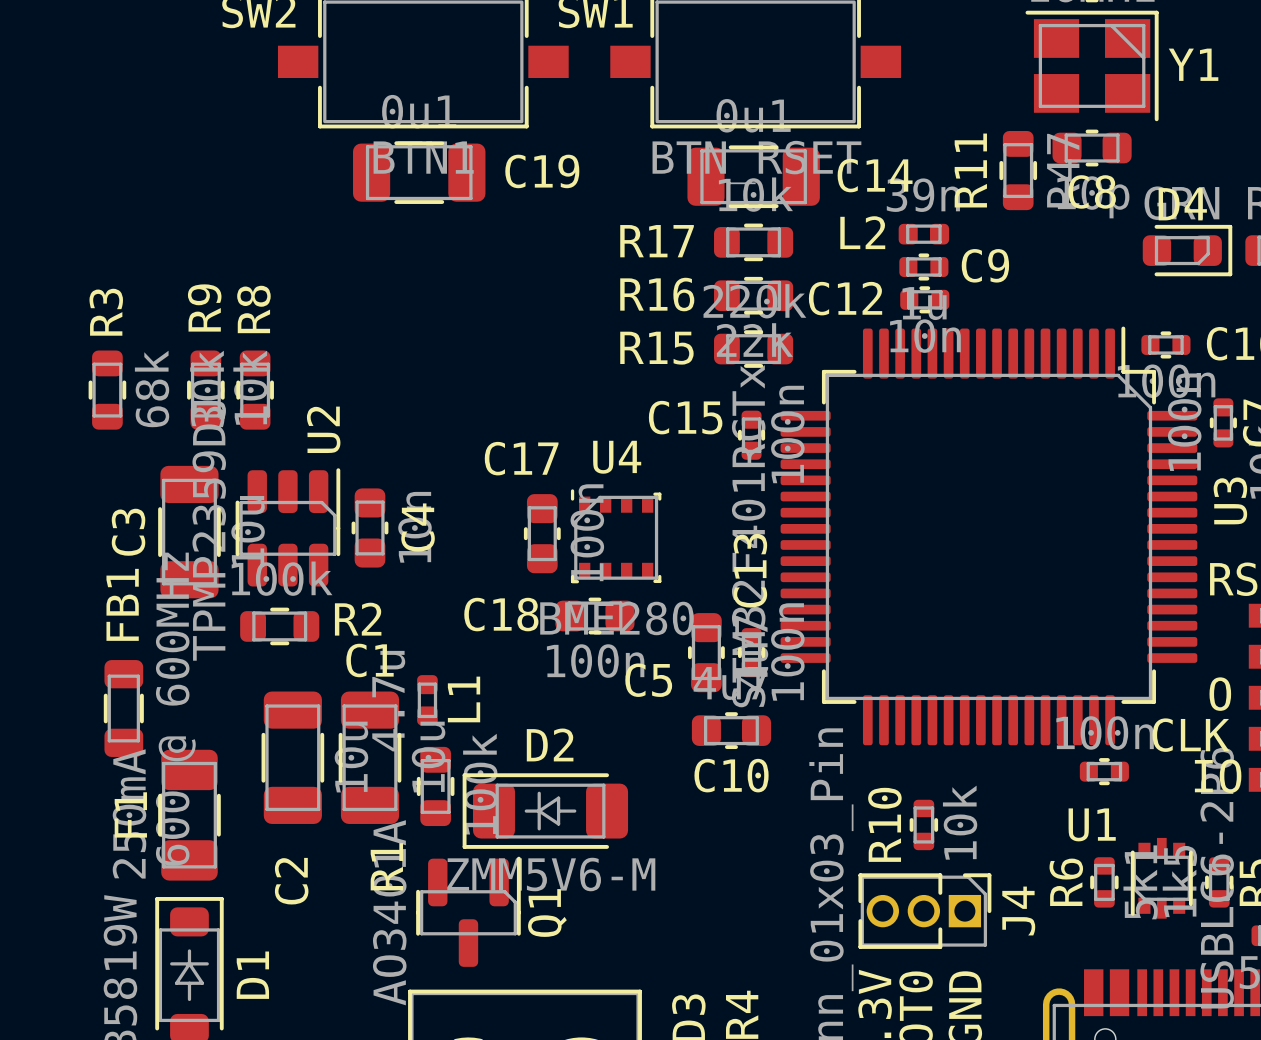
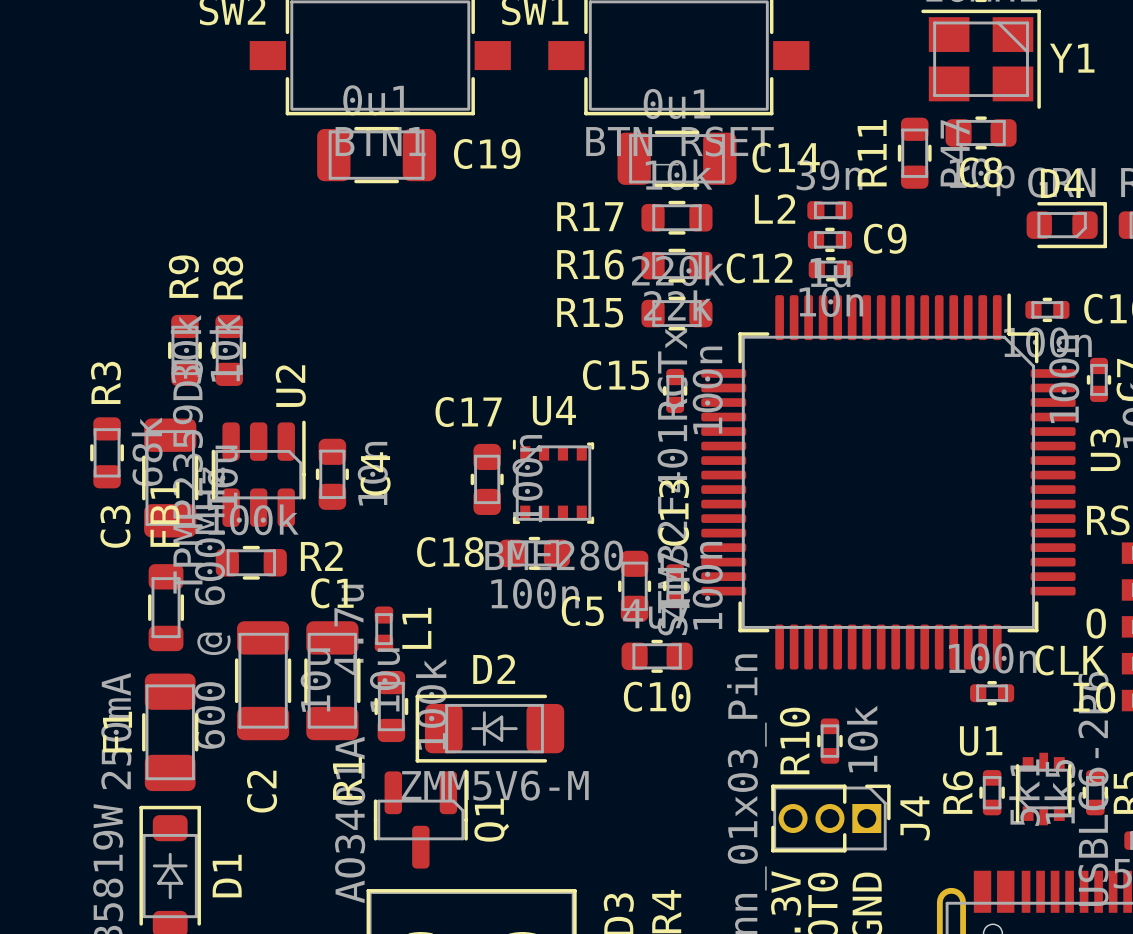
R3 position: (107, 390) -> (107, 452)
C3 name position: C3 (128, 532) -> C3 (115, 526)
FB1 position: (123, 708) -> (166, 607)

